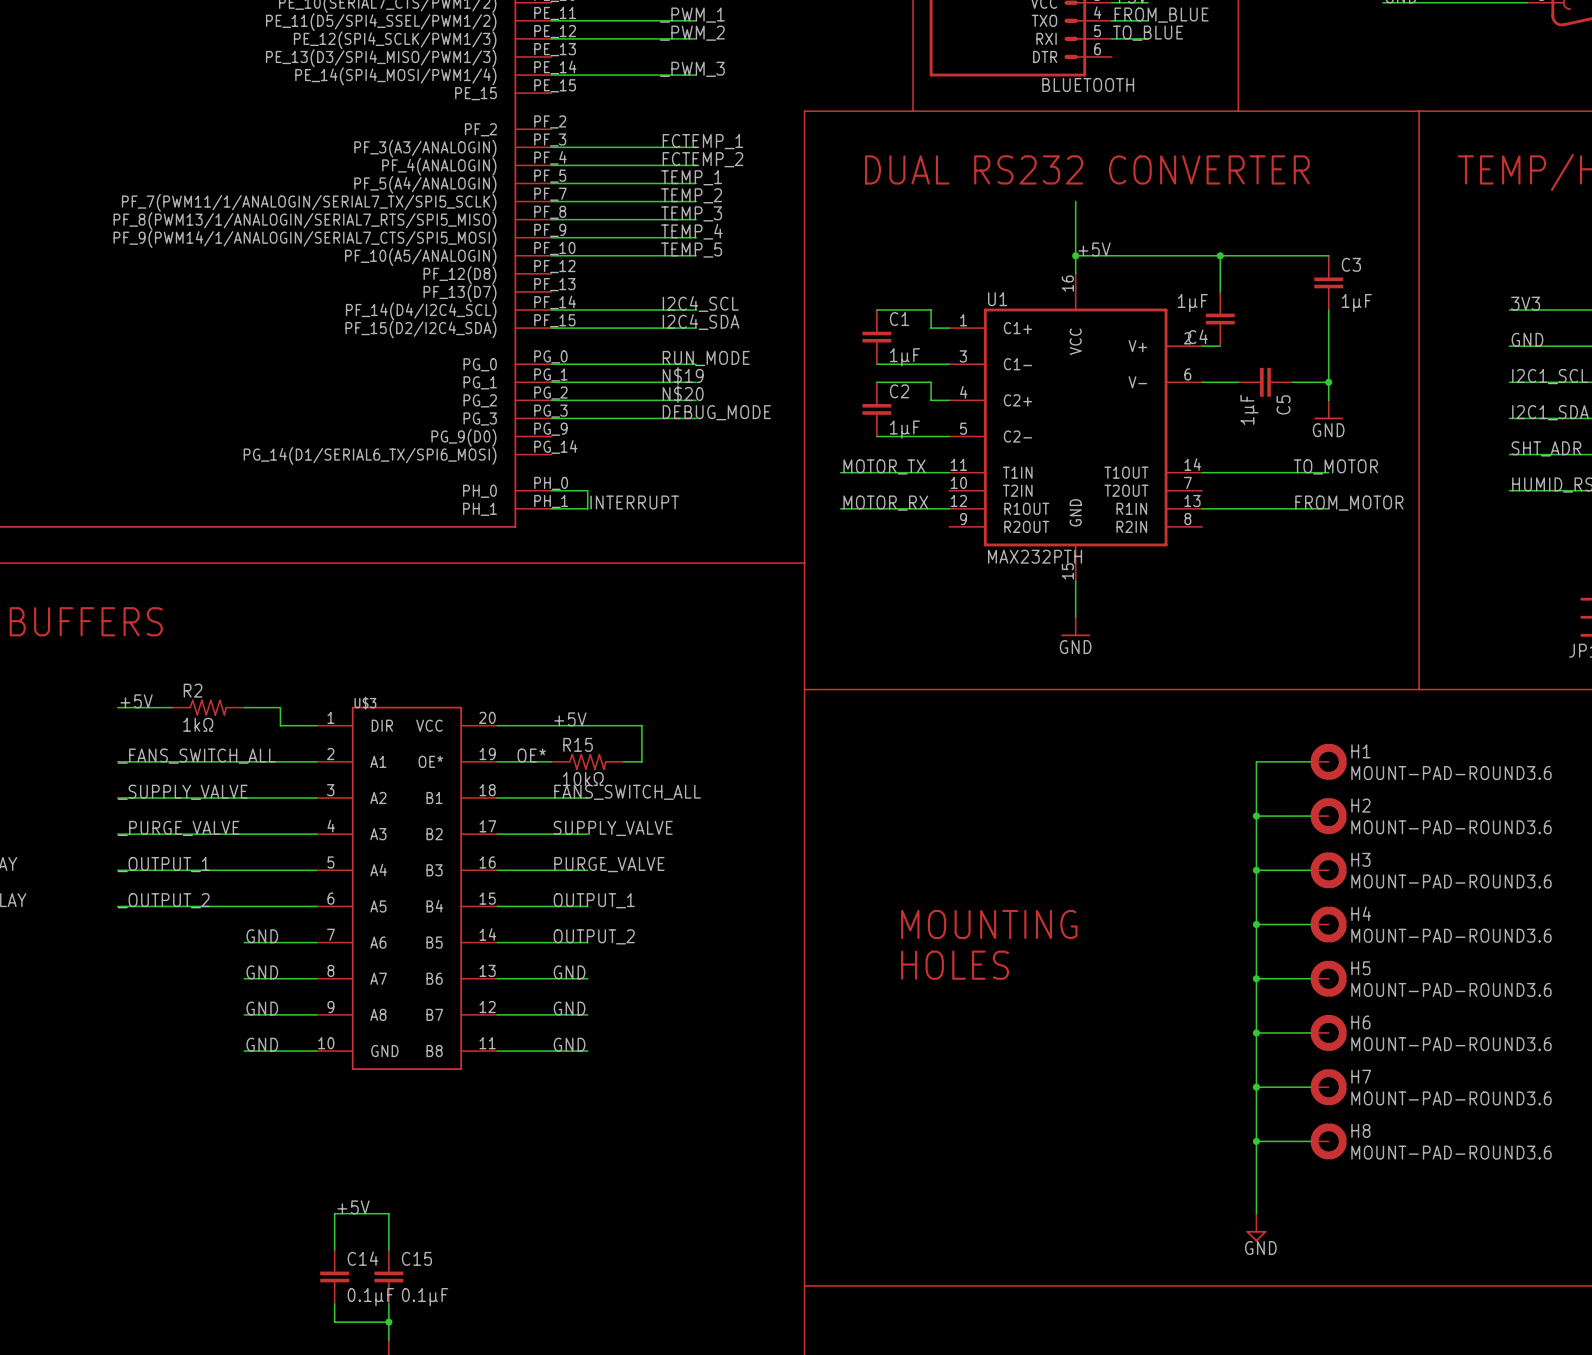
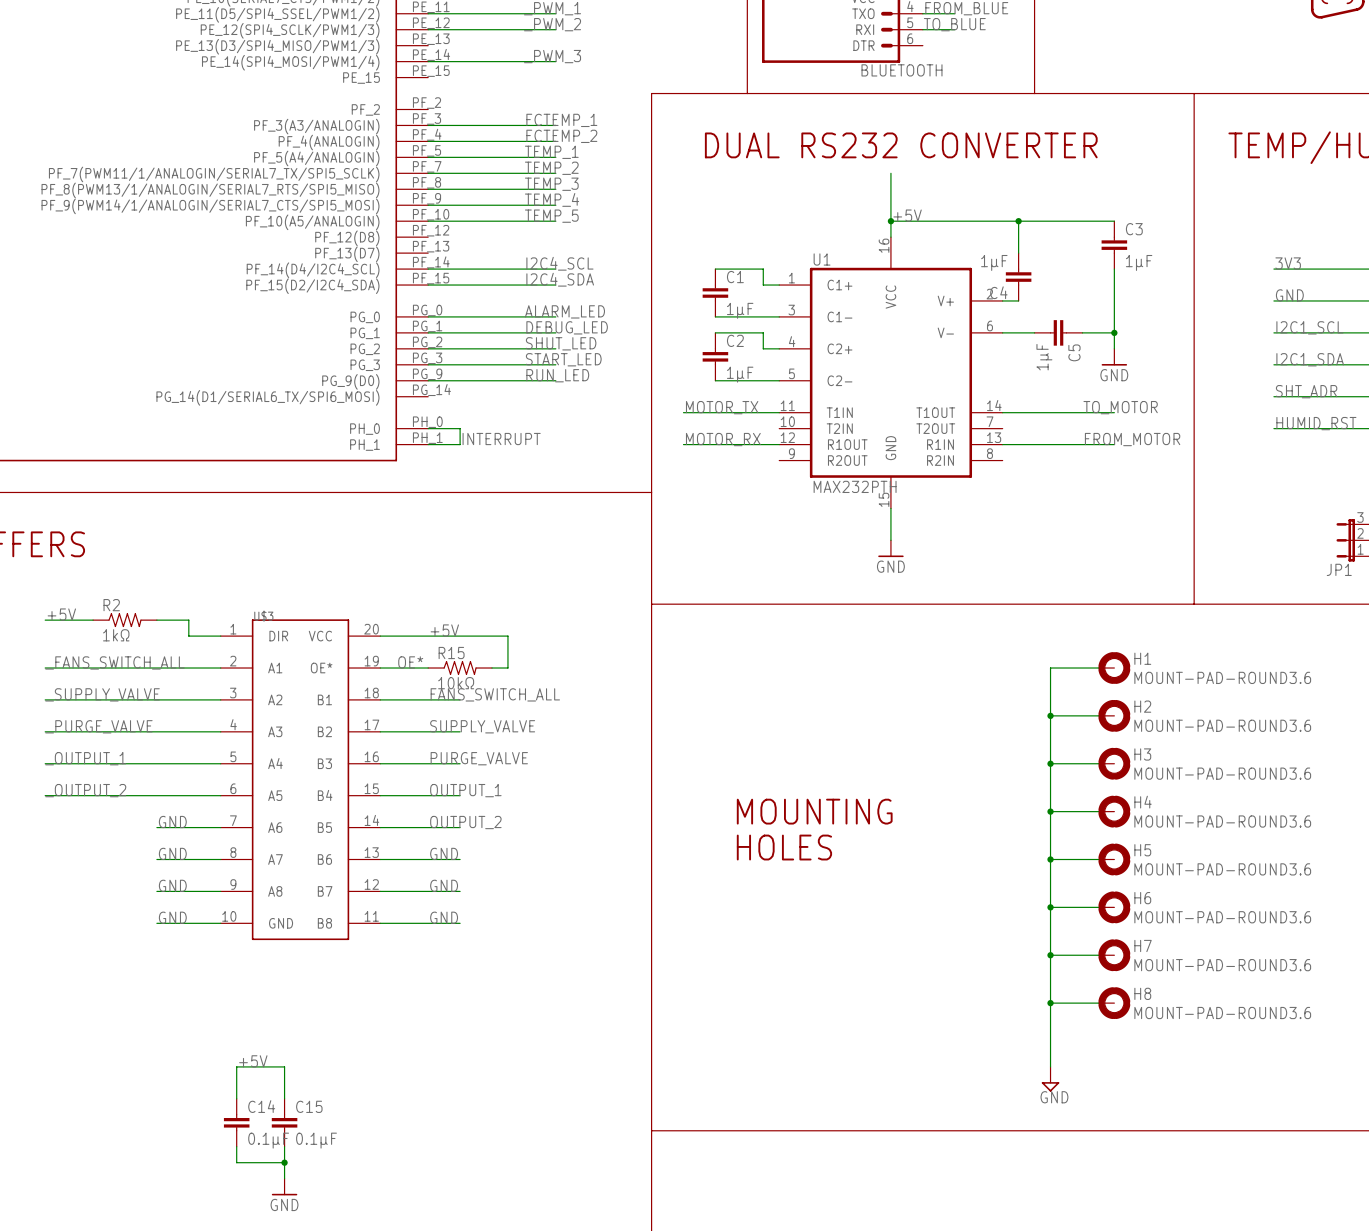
label: RUN_MODE (706, 358) -> ALARM_LED (564, 311)
label: N$19 (683, 375) -> DEBUG_LED (567, 327)
label: N$20 (683, 394) -> SHUT_LED (561, 343)
label: DEBUG_MODE (716, 412) -> START_LED (563, 359)
label: none -> RUN_LED (557, 375)
wire: none -> (428, 380) (555, 380)

